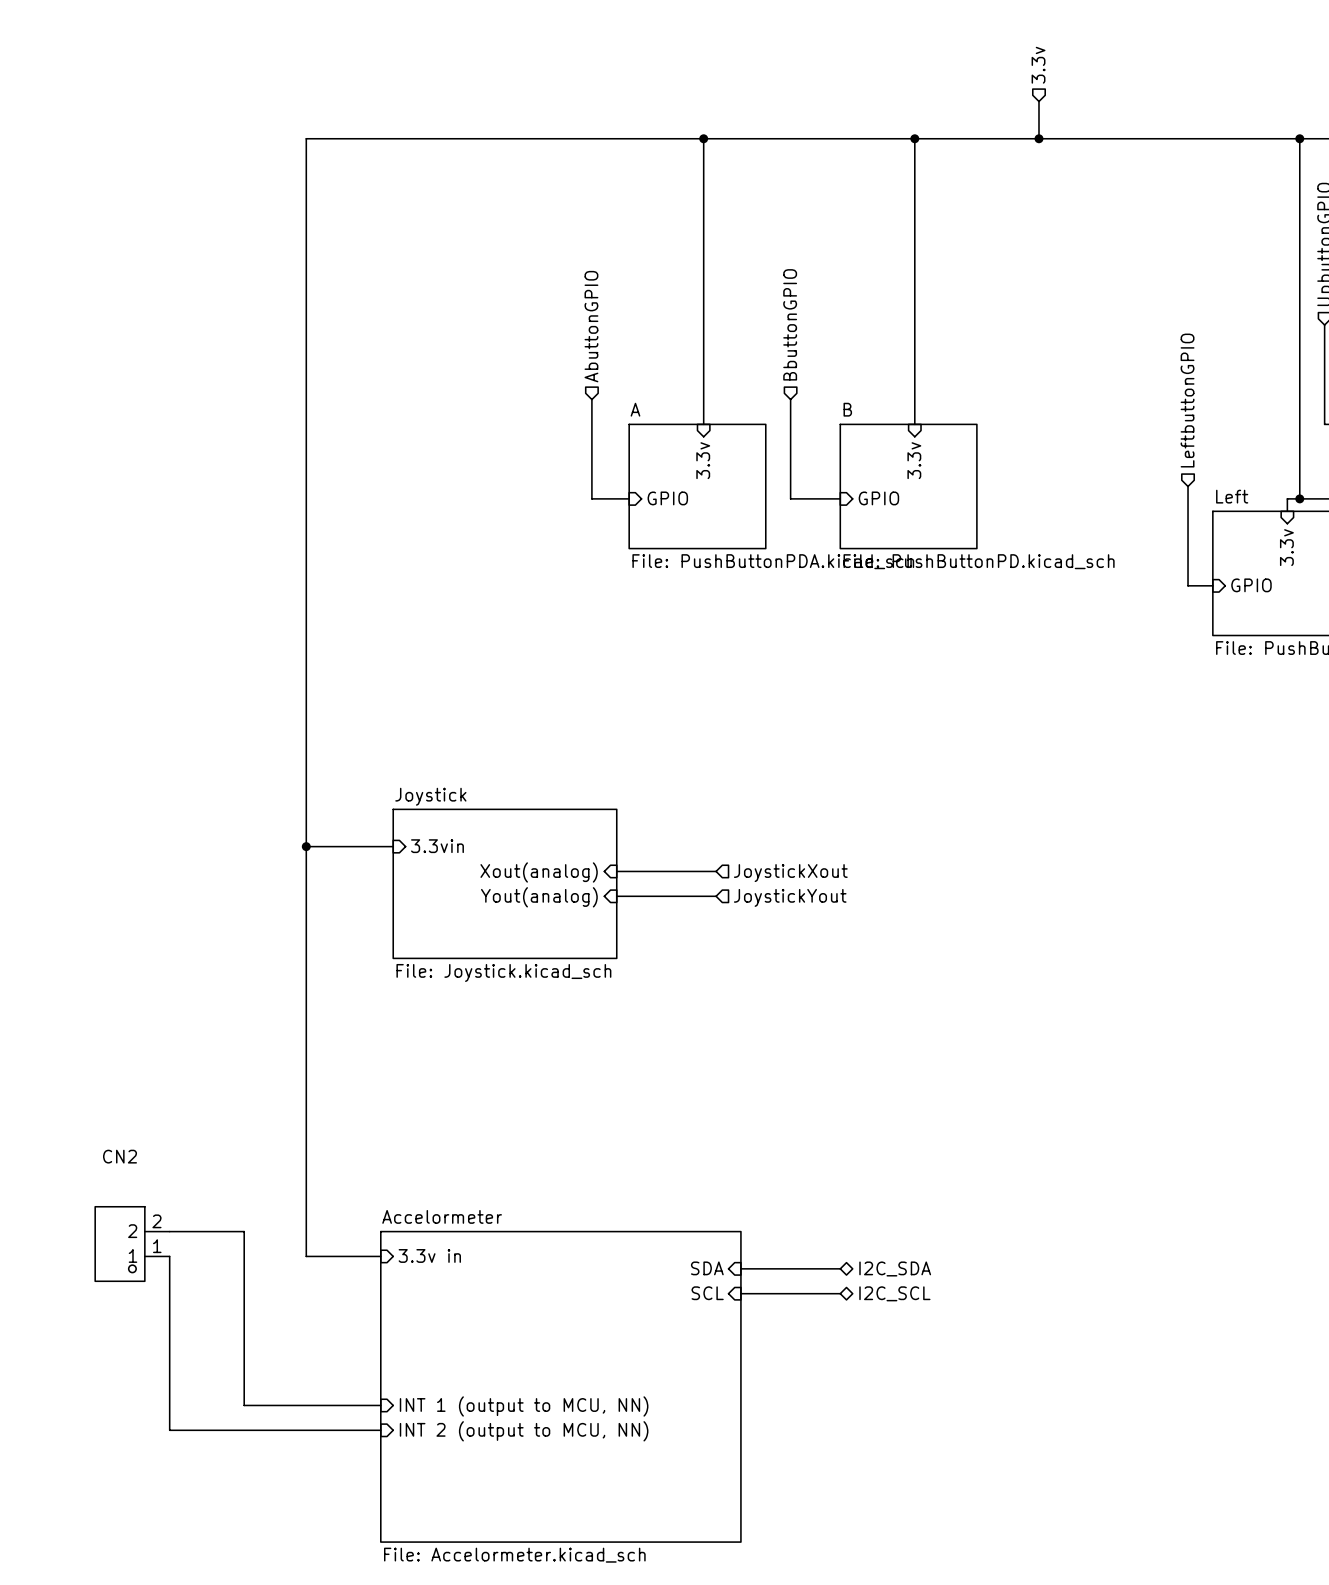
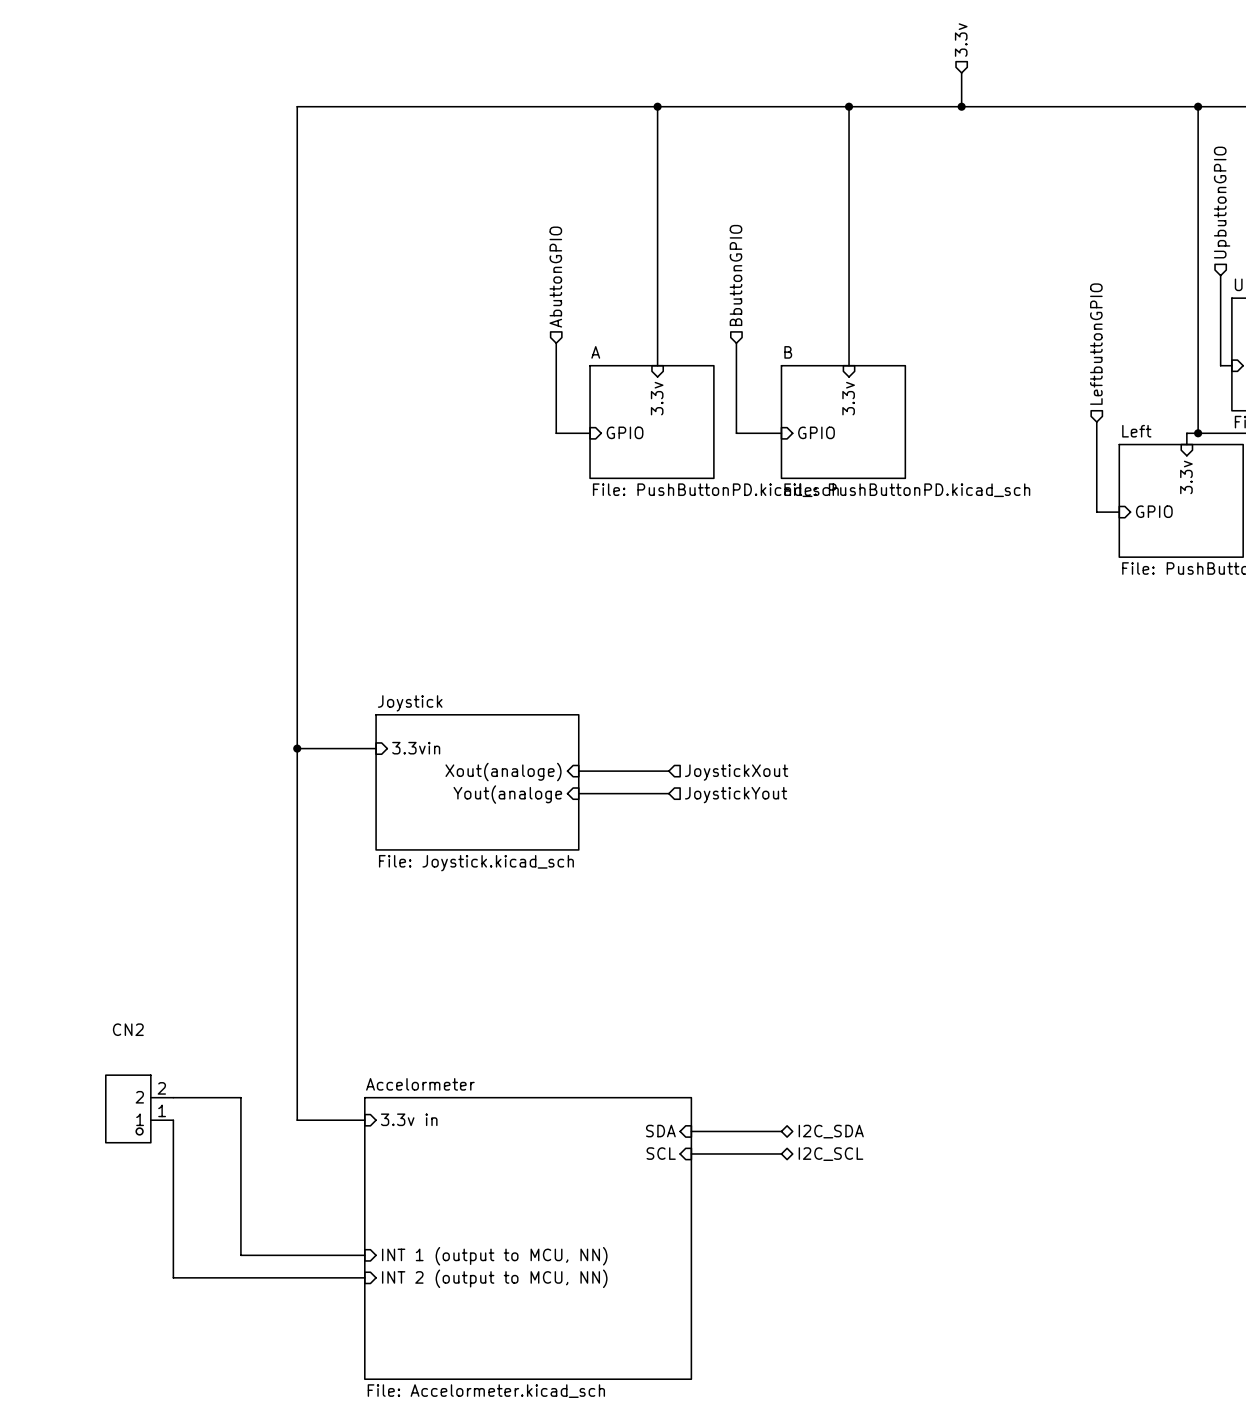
sheet A value: File: PushButtonPDA.kicad_sch (773, 561) -> File: PushButtonPD.kicad_sch (715, 490)
sheet pin: Xout(analog) (539, 872) -> Xout(analoge) (503, 772)
sheet pin: Yout(analog) (539, 897) -> Yout(analoge (507, 794)

